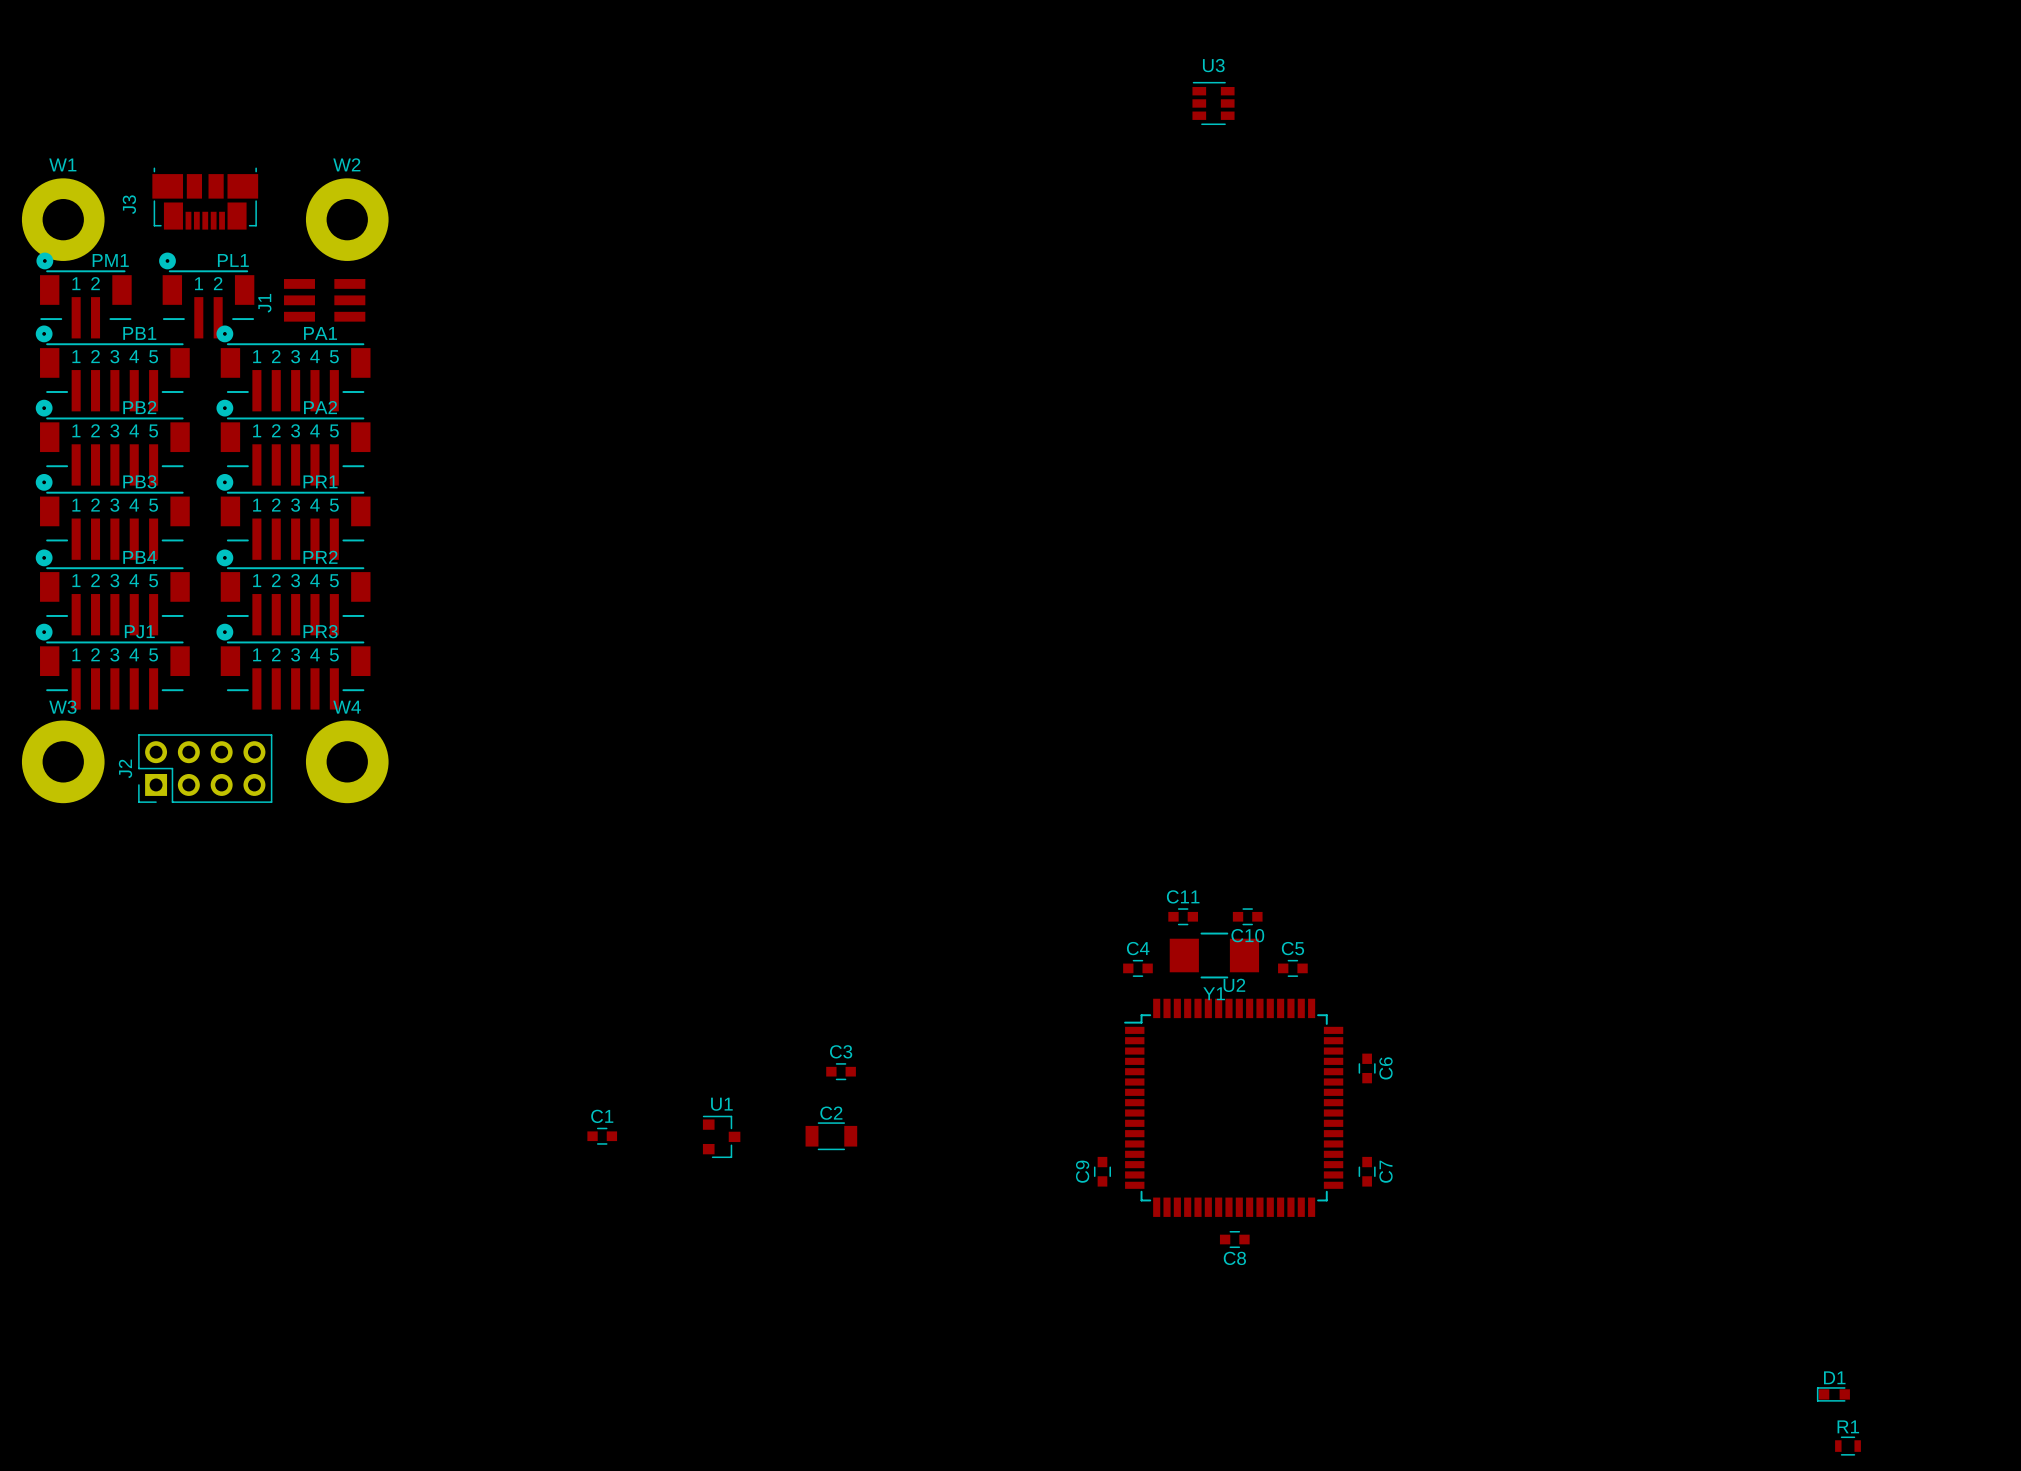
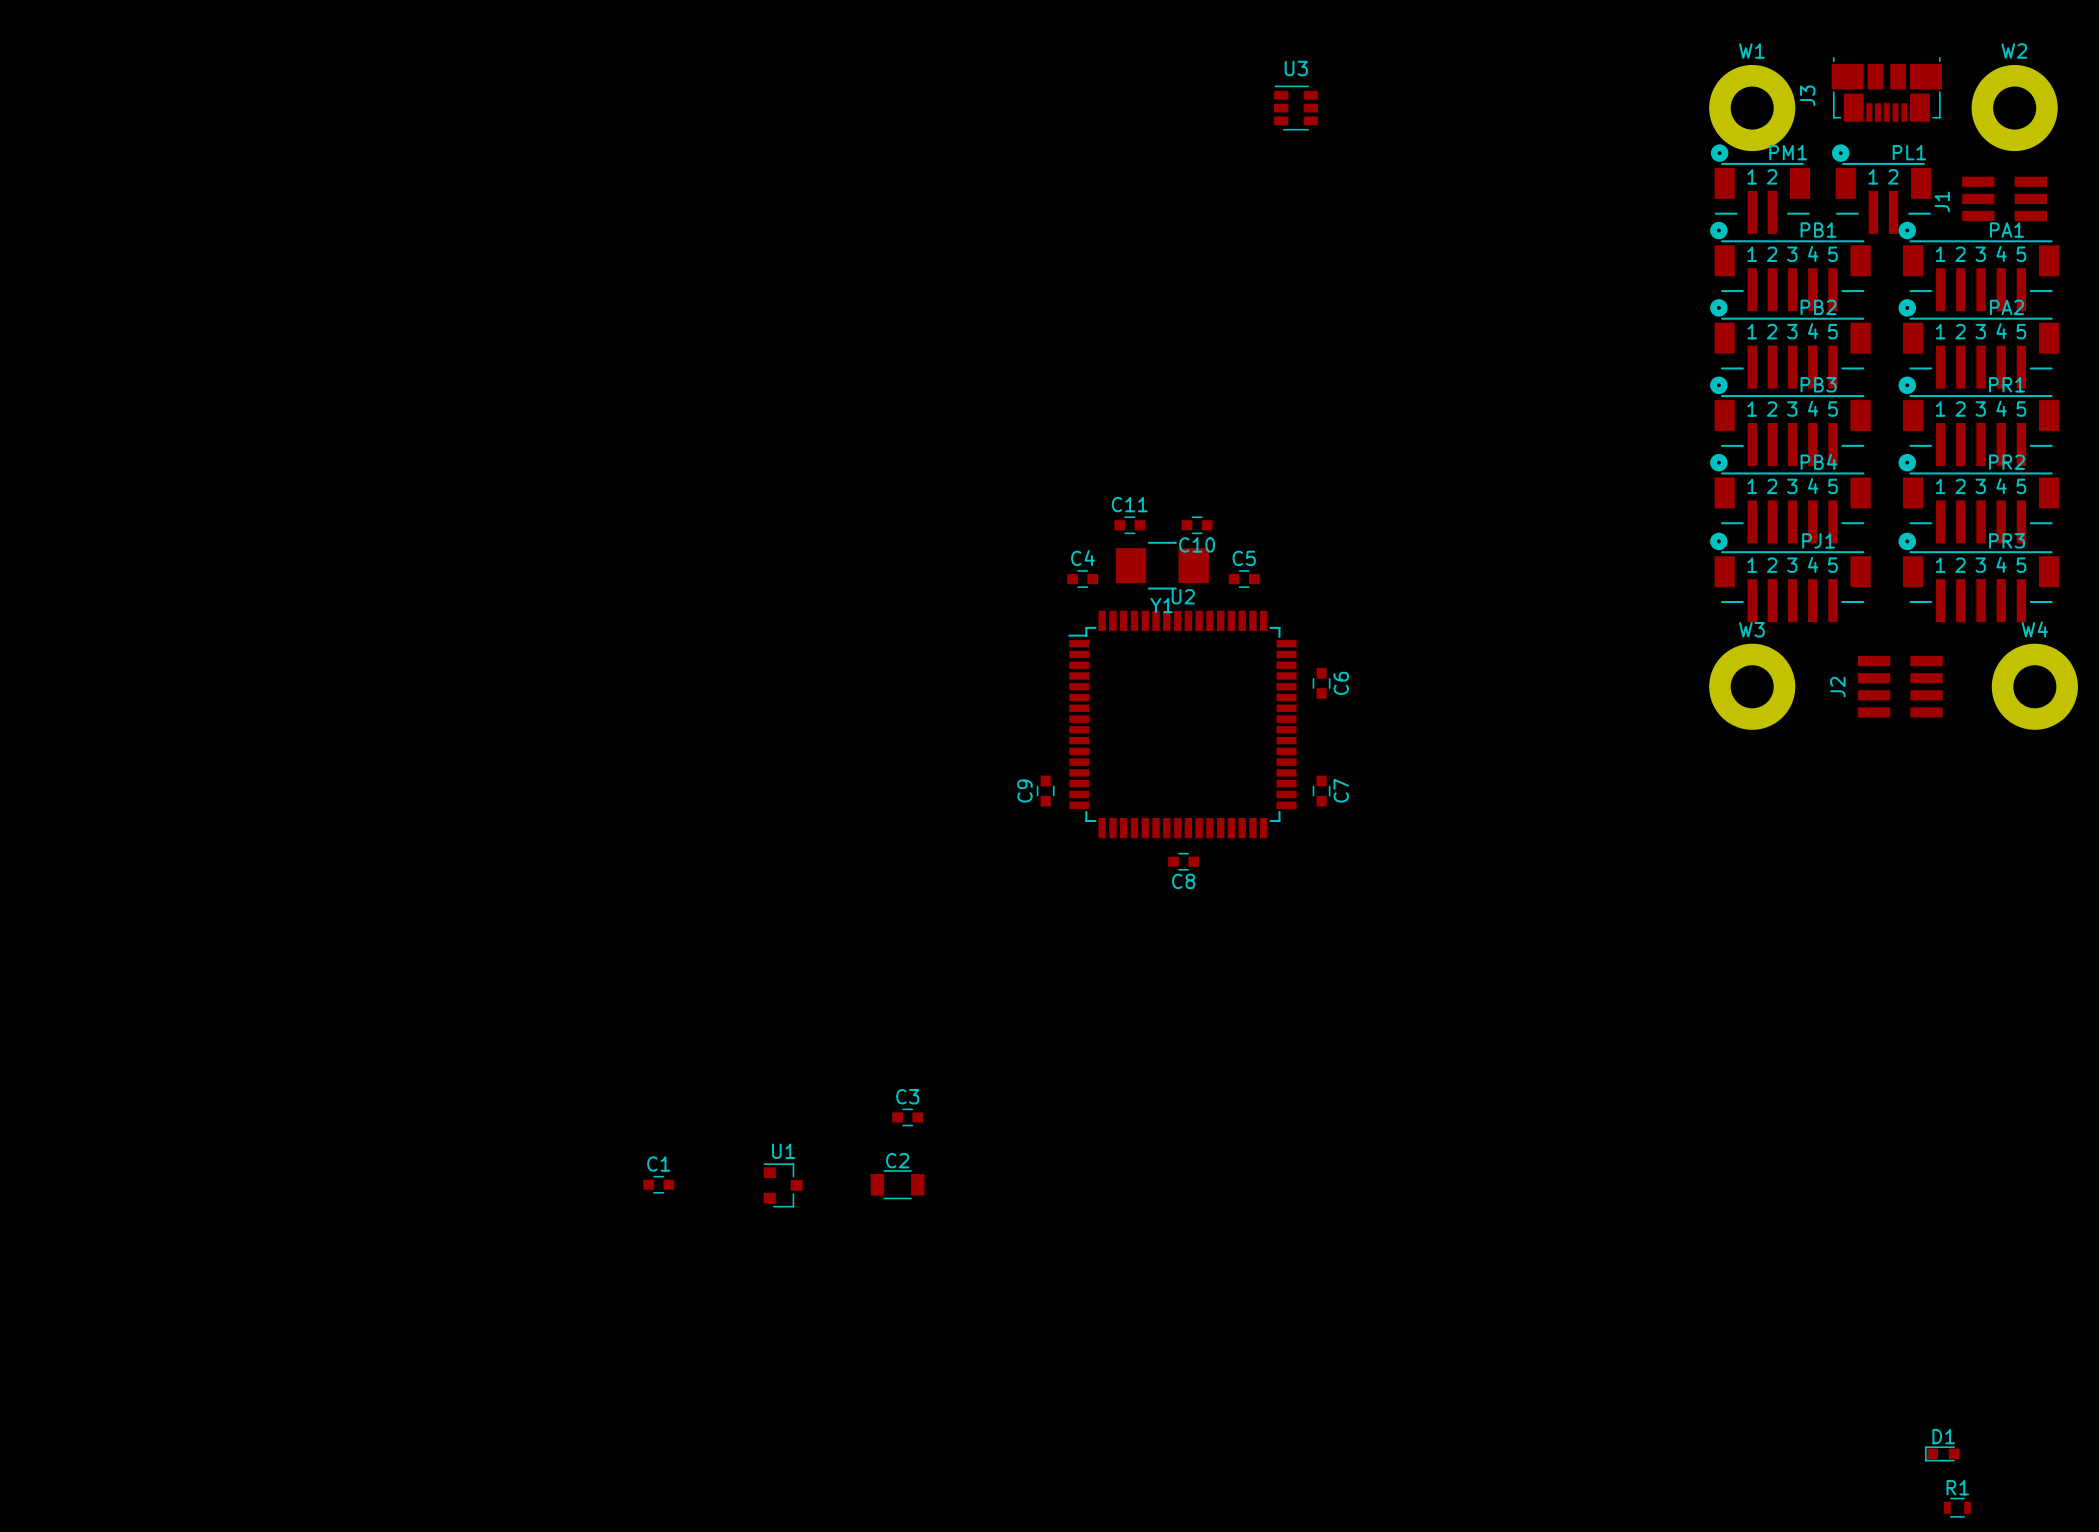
J3 position: (205, 198) -> (1886, 89)
W1 position: (63, 219) -> (1752, 108)
W2 position: (347, 219) -> (2014, 108)
PM1 position: (84, 295) -> (1760, 189)
PL1 position: (206, 295) -> (1881, 189)
J1 position: (324, 300) -> (2004, 198)
PB1 position: (112, 368) -> (1790, 266)
PA1 position: (293, 368) -> (1978, 266)
PB2 position: (112, 442) -> (1790, 343)
PA2 position: (293, 442) -> (1978, 343)
PB3 position: (112, 516) -> (1790, 421)
PR1 position: (293, 516) -> (1978, 421)
PB4 position: (112, 592) -> (1790, 498)
PR2 position: (293, 592) -> (1978, 498)
PJ1 position: (112, 666) -> (1790, 577)
PR3 position: (293, 666) -> (1978, 577)
J2 footprint: [138, 734, 273, 803] -> [1857, 656, 1943, 718]
W3 position: (63, 761) -> (1752, 686)
W4 position: (347, 761) -> (2034, 686)
C11 position: (1183, 916) -> (1129, 525)
C10 position: (1247, 916) -> (1197, 525)
Y1 position: (1214, 955) -> (1162, 565)
C4 position: (1137, 968) -> (1082, 579)
C5 position: (1292, 968) -> (1244, 579)
C6 position: (1367, 1068) -> (1321, 683)
U2 position: (1233, 1107) -> (1182, 724)
C9 position: (1102, 1171) -> (1045, 791)
C7 position: (1367, 1171) -> (1321, 791)
C8 position: (1234, 1239) -> (1183, 861)

